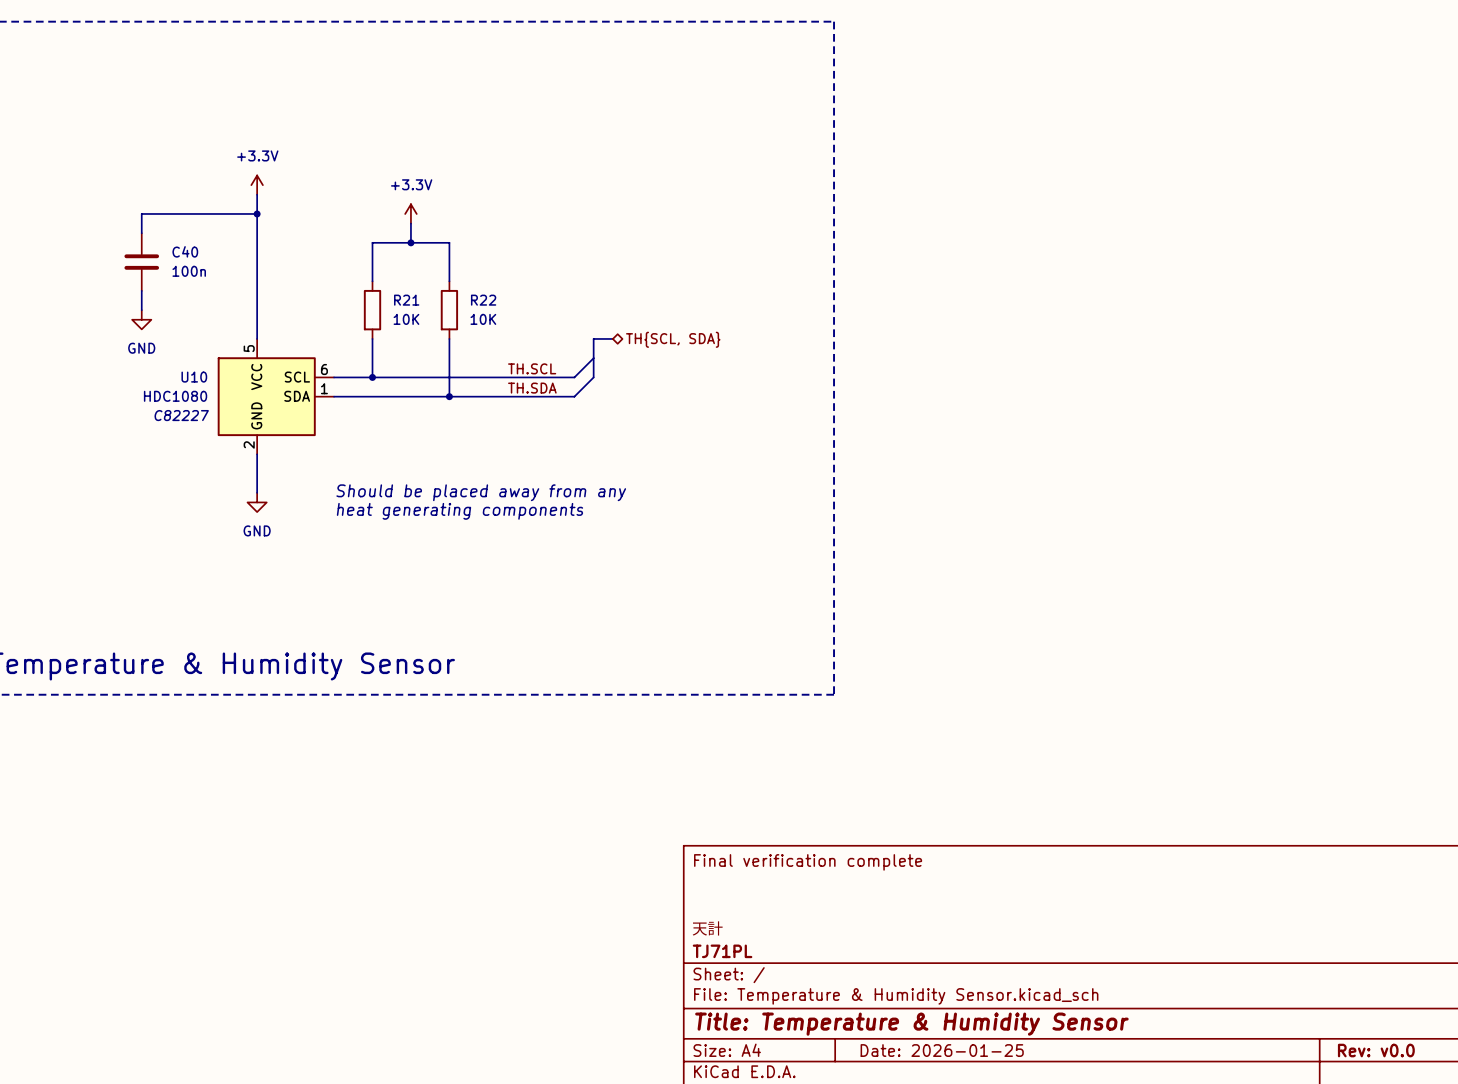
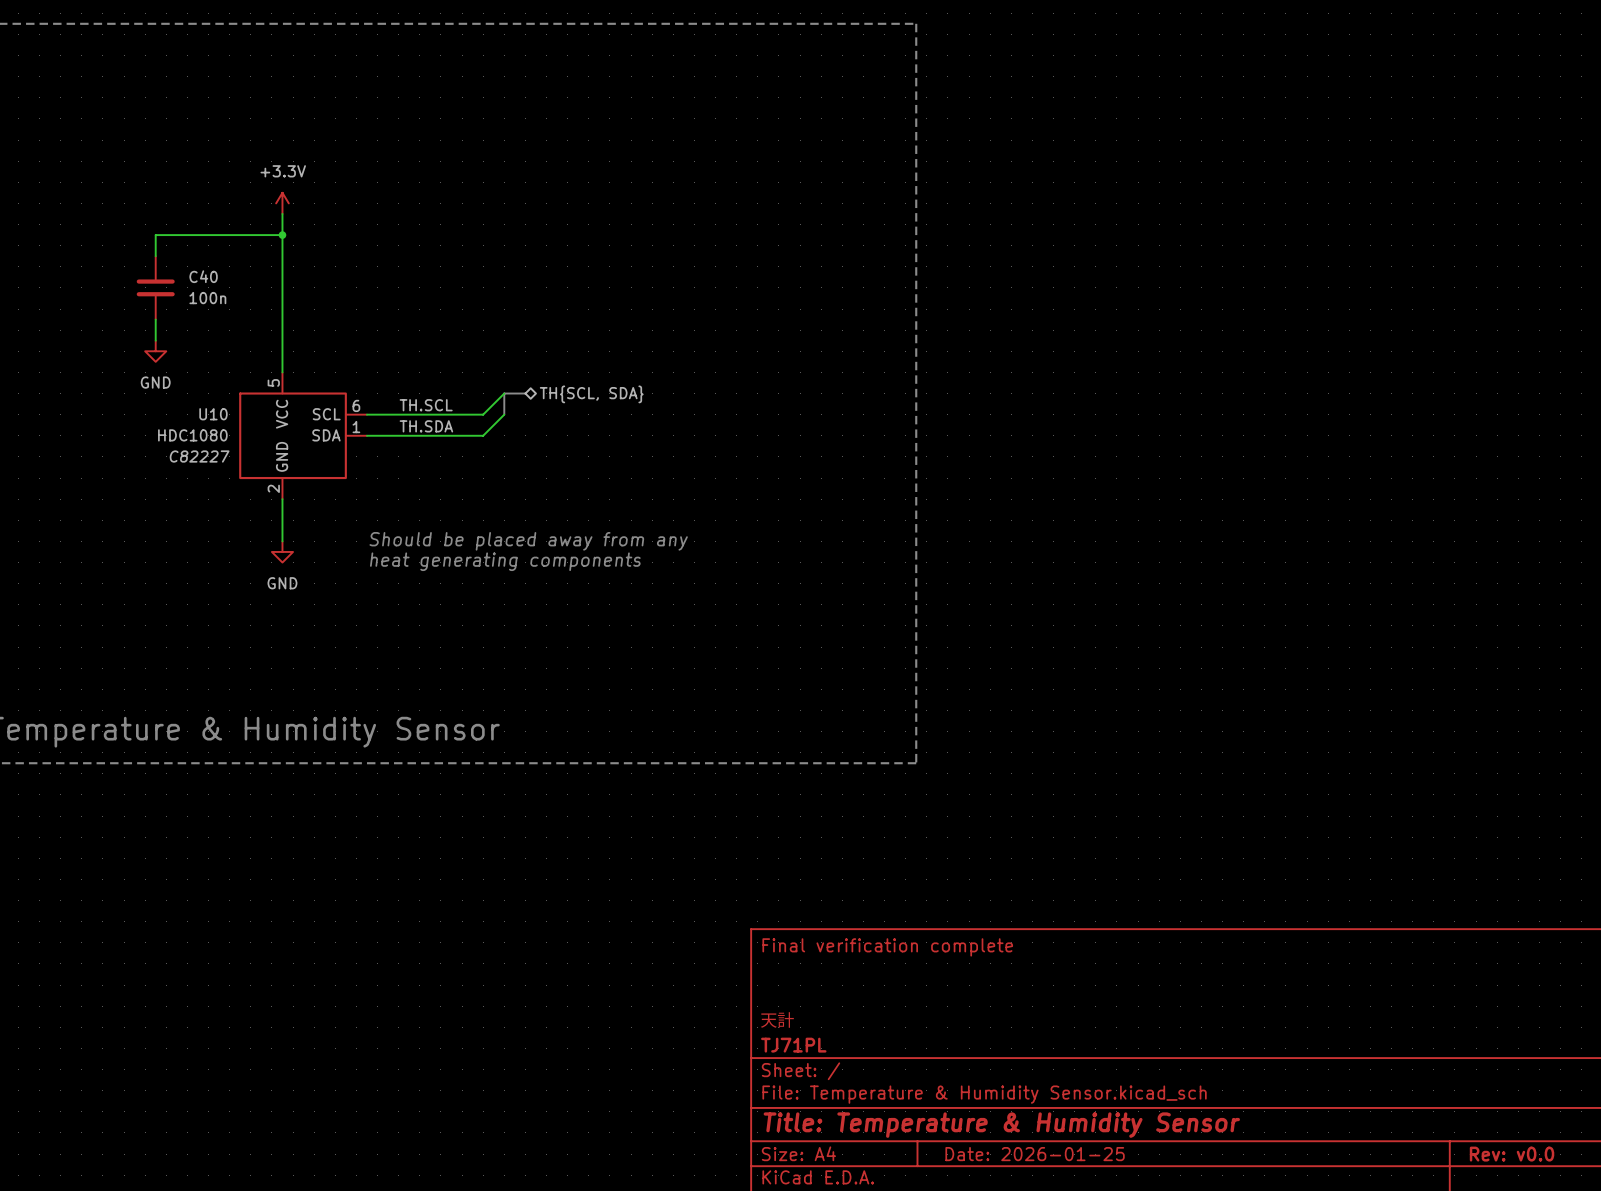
power symbol: +3.3V (410, 213) -> none
wire: (410, 223) (410, 242) -> none
junction: (410, 242) -> none
wire: (372, 281) (372, 242) (449, 242) (449, 281) -> none
R21: 10K (372, 310) -> none
R22: 10K (449, 310) -> none
wire: (372, 338) (372, 377) -> none
wire: (449, 338) (449, 396) -> none
bus: (612, 338) (593, 338) (593, 377) -> none
hierarchical label position: TH{SCL, SDA} (673, 339) -> TH{SCL, SDA} (591, 394)
bus: none -> (525, 393) (504, 393) (504, 414)
wire: (593, 358) (574, 377) (439, 377) -> (504, 393) (483, 414)
label position: TH.SCL (532, 368) -> TH.SCL (426, 405)
junction: (372, 377) -> none
wire: (593, 377) (574, 396) (439, 396) -> (504, 414) (483, 435)
label position: TH.SDA (532, 388) -> TH.SDA (426, 426)
junction: (449, 396) -> none

